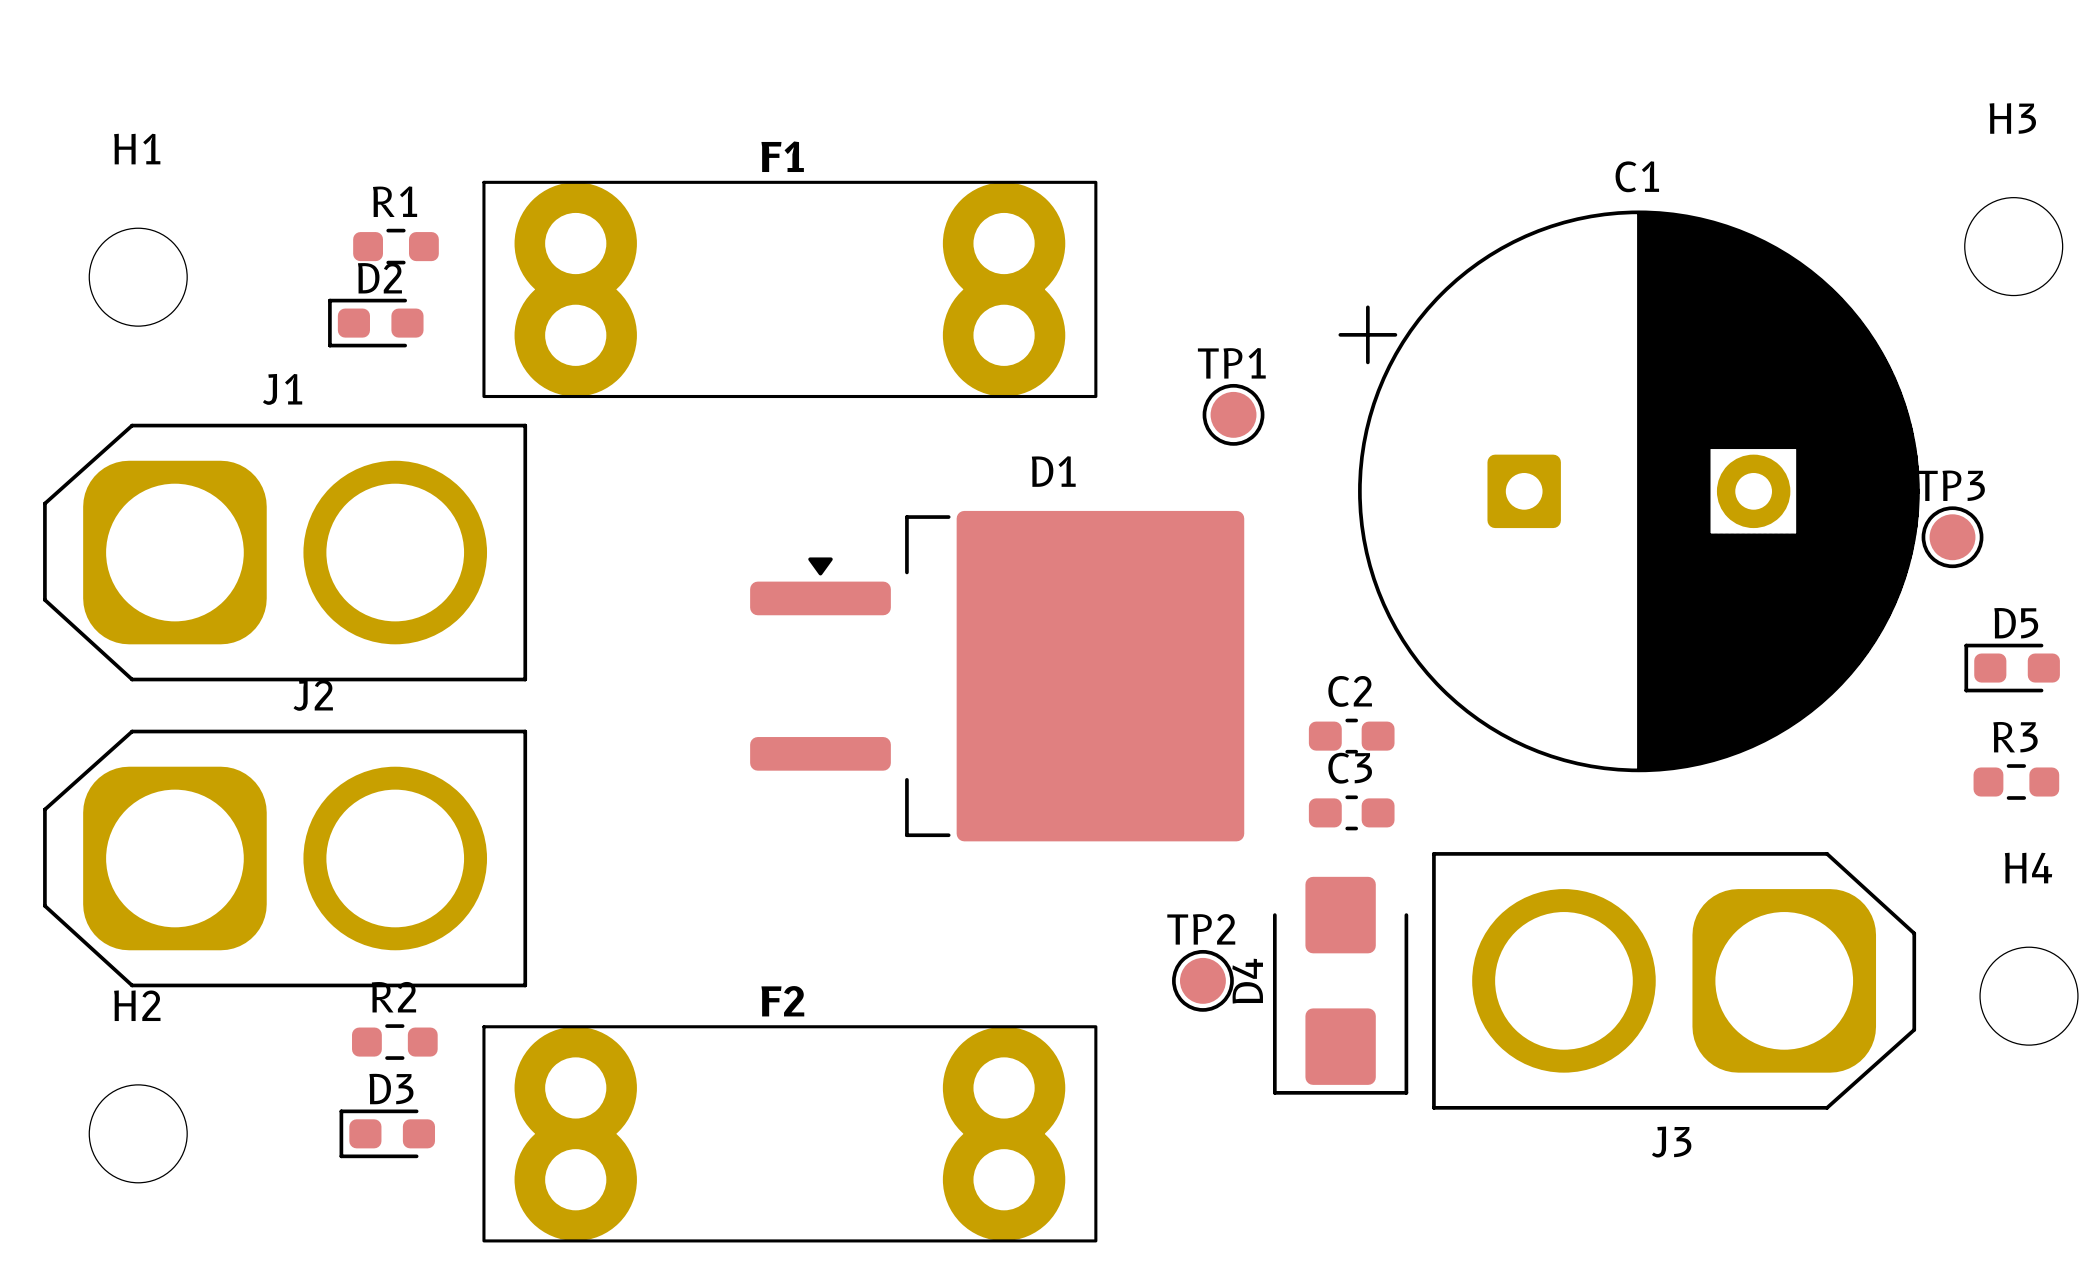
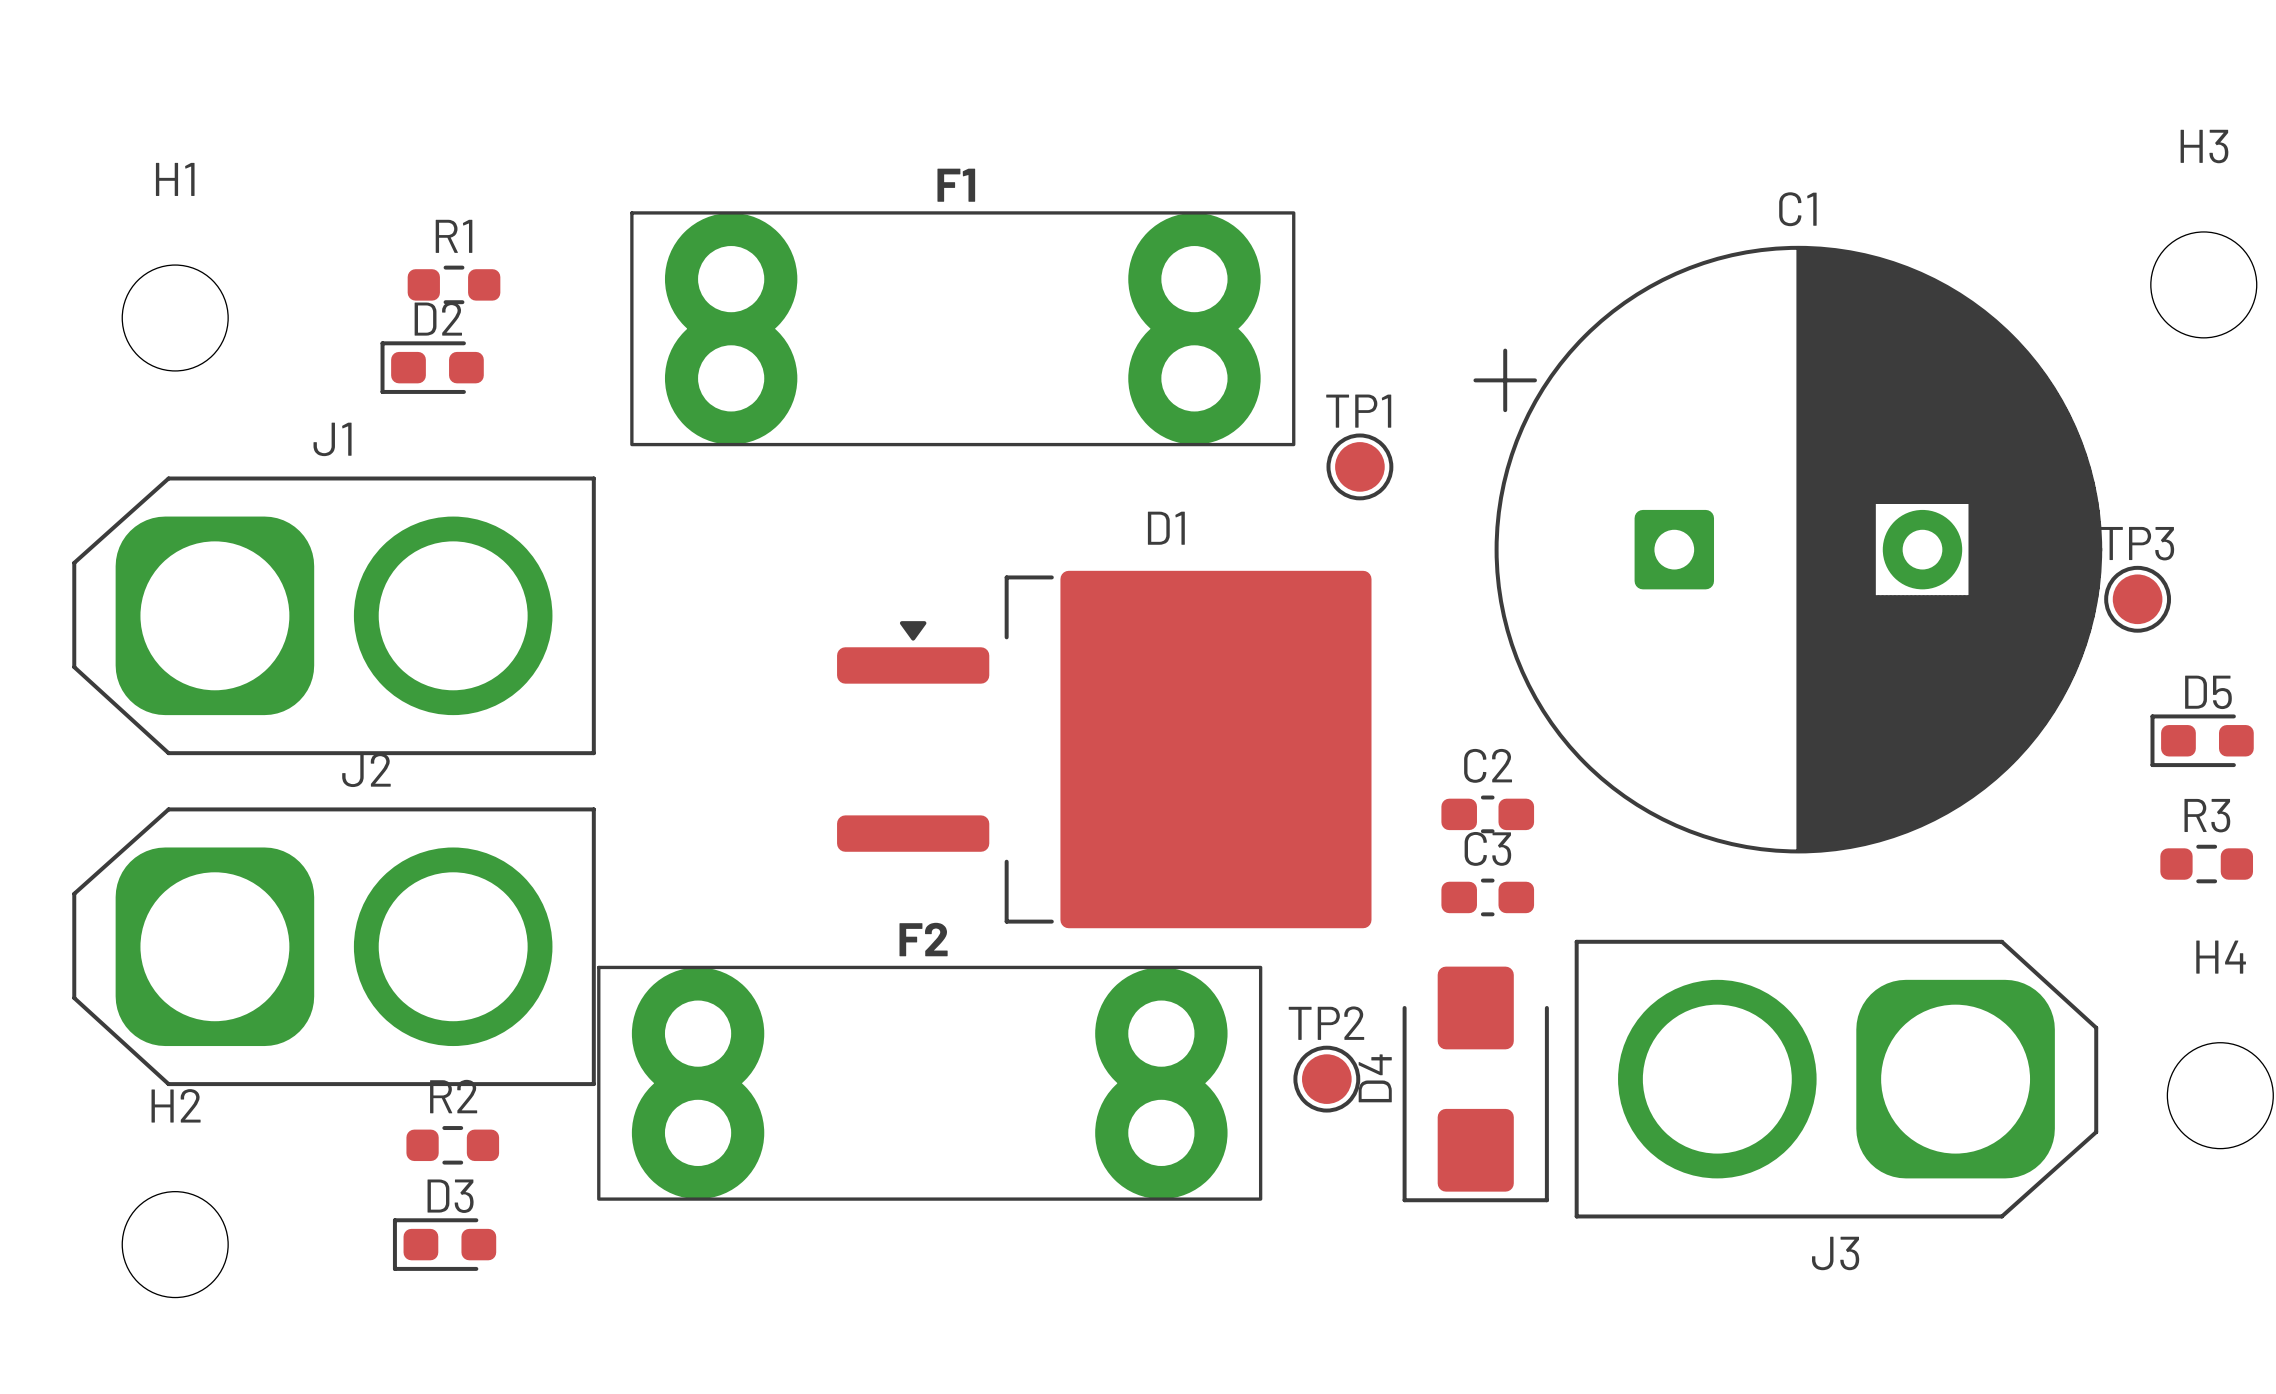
F1 position: (789, 289) -> (962, 328)
F2 position: (789, 1133) -> (929, 1083)

